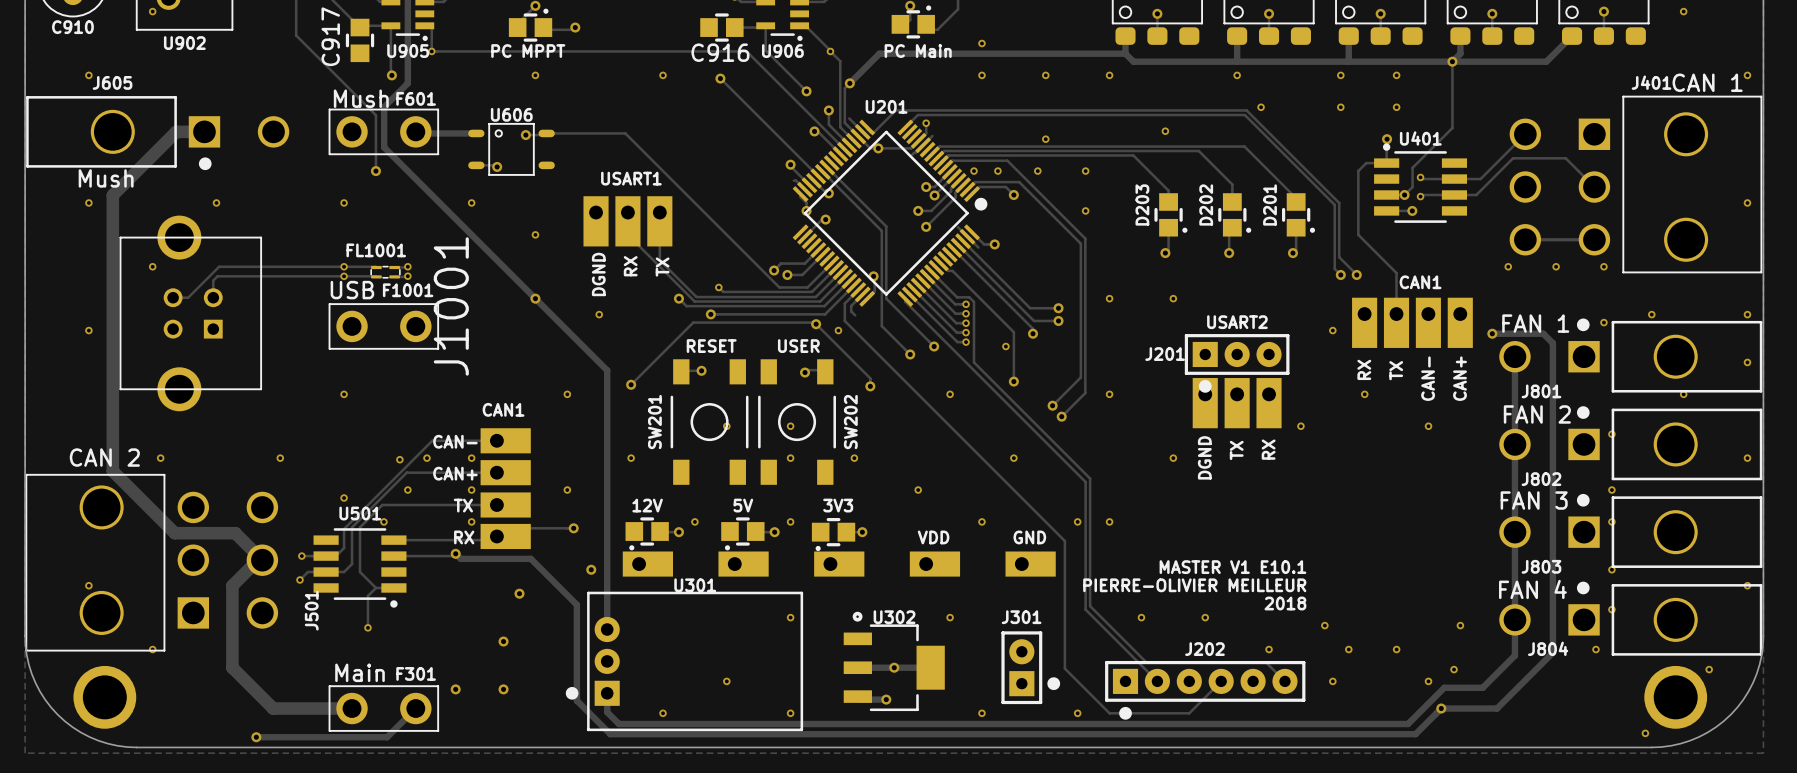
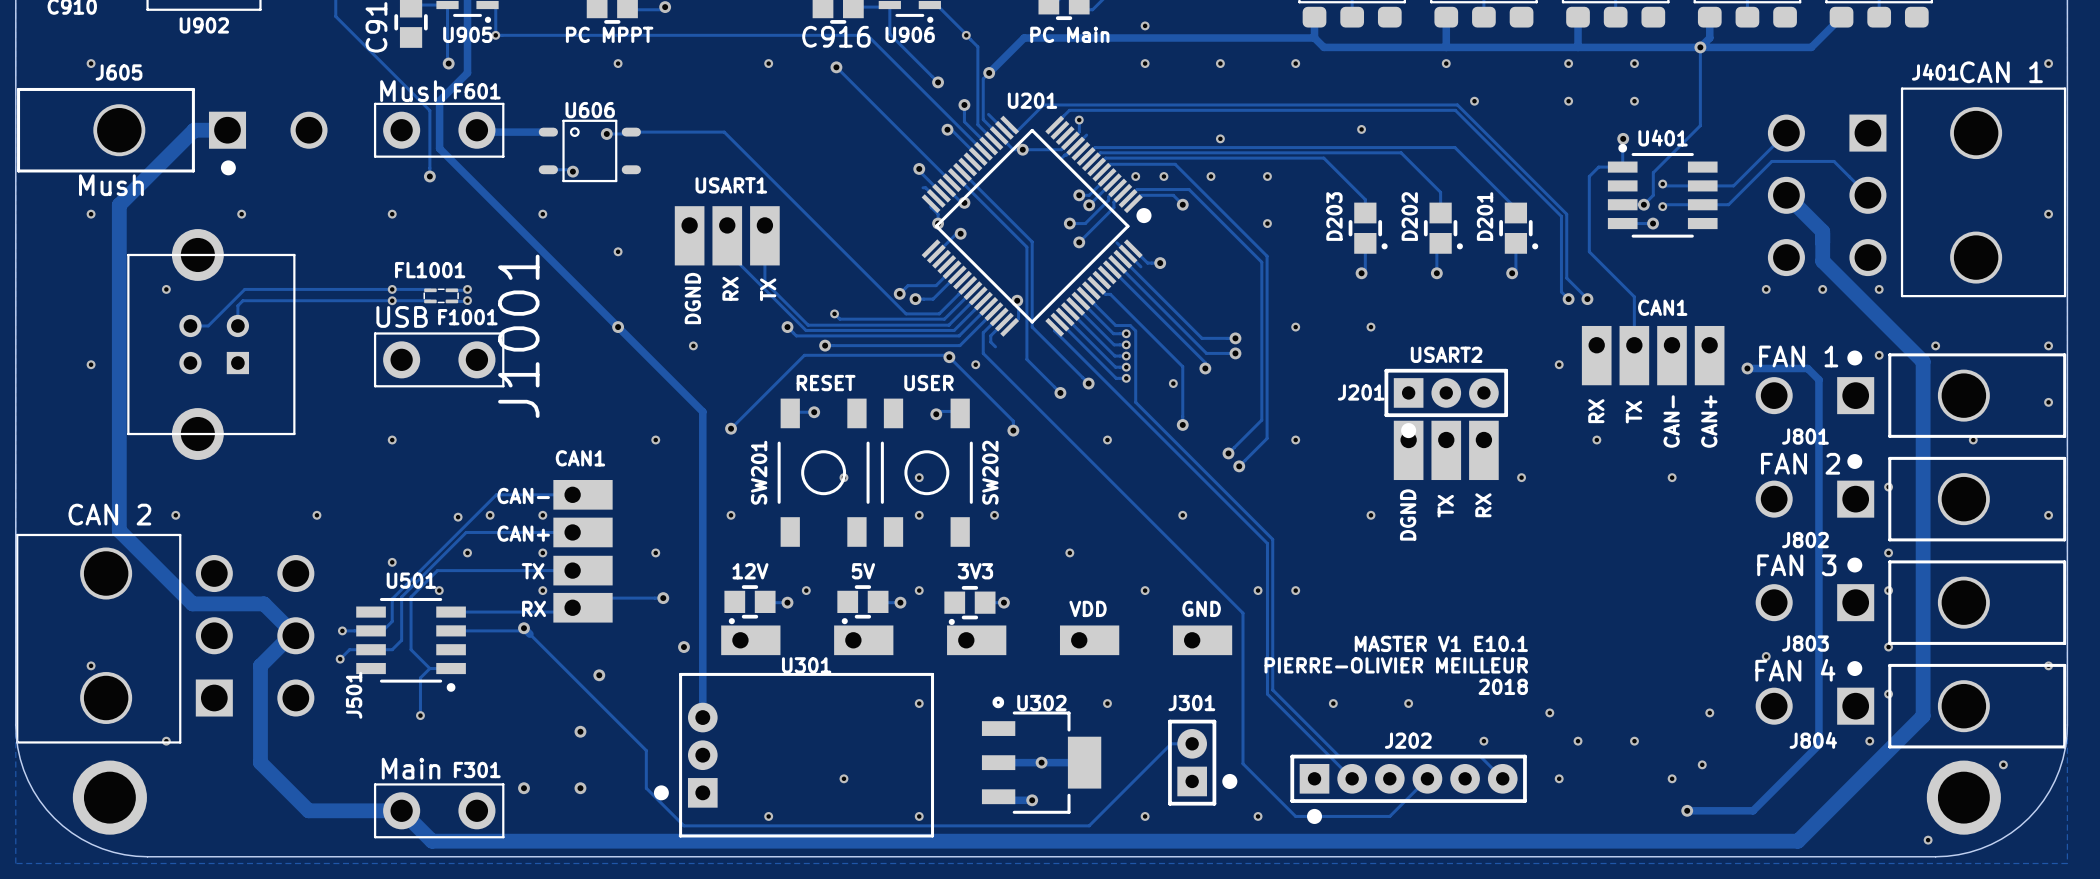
track: none -> (1786, 195) (1822, 231) (1822, 261) (1923, 361) (1923, 716) (1797, 841) (432, 841) (401, 810)
track: (1525, 239) (1594, 239) -> none
track: (1514, 356) (1514, 655) (1482, 687) (1444, 687) (1408, 724) (618, 724) (607, 712) (607, 693) -> none
track: (460, 558) (530, 558) (576, 604) (576, 700) (610, 734) (1415, 734) (1441, 708) -> (529, 634) (646, 750) (646, 788) (683, 825) (1089, 825) (1171, 743) (1192, 743)
via: none -> (1766, 656)
track: (415, 708) (387, 737) (256, 737) -> none
via: (256, 737) -> none

